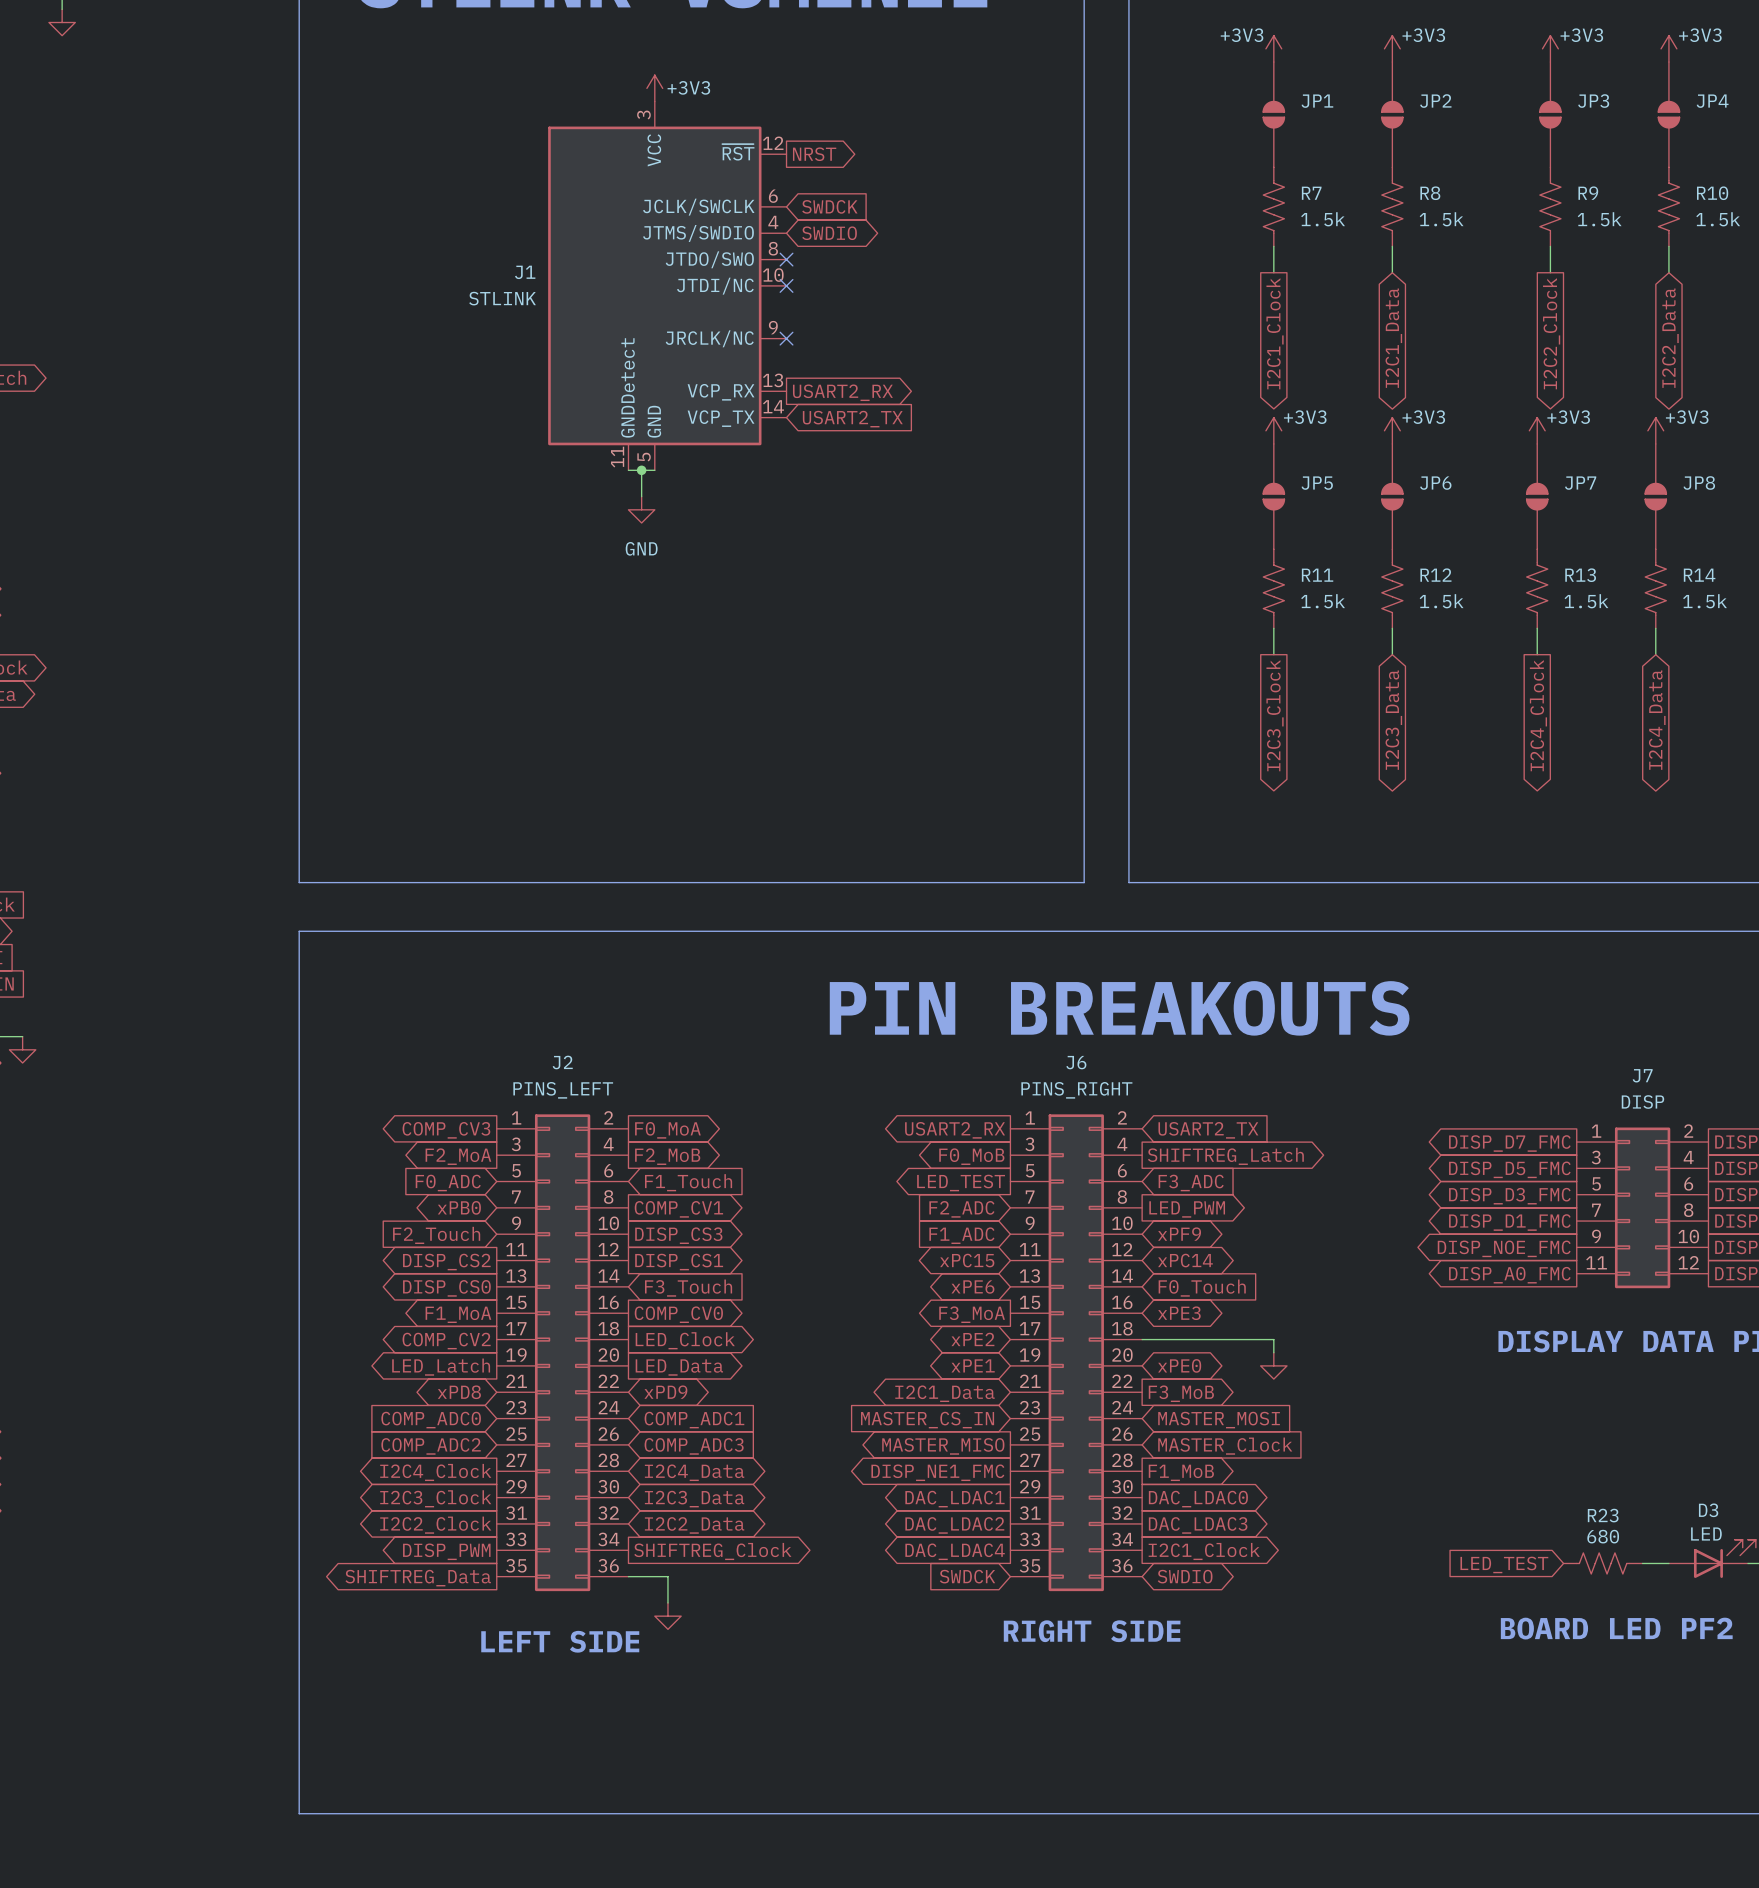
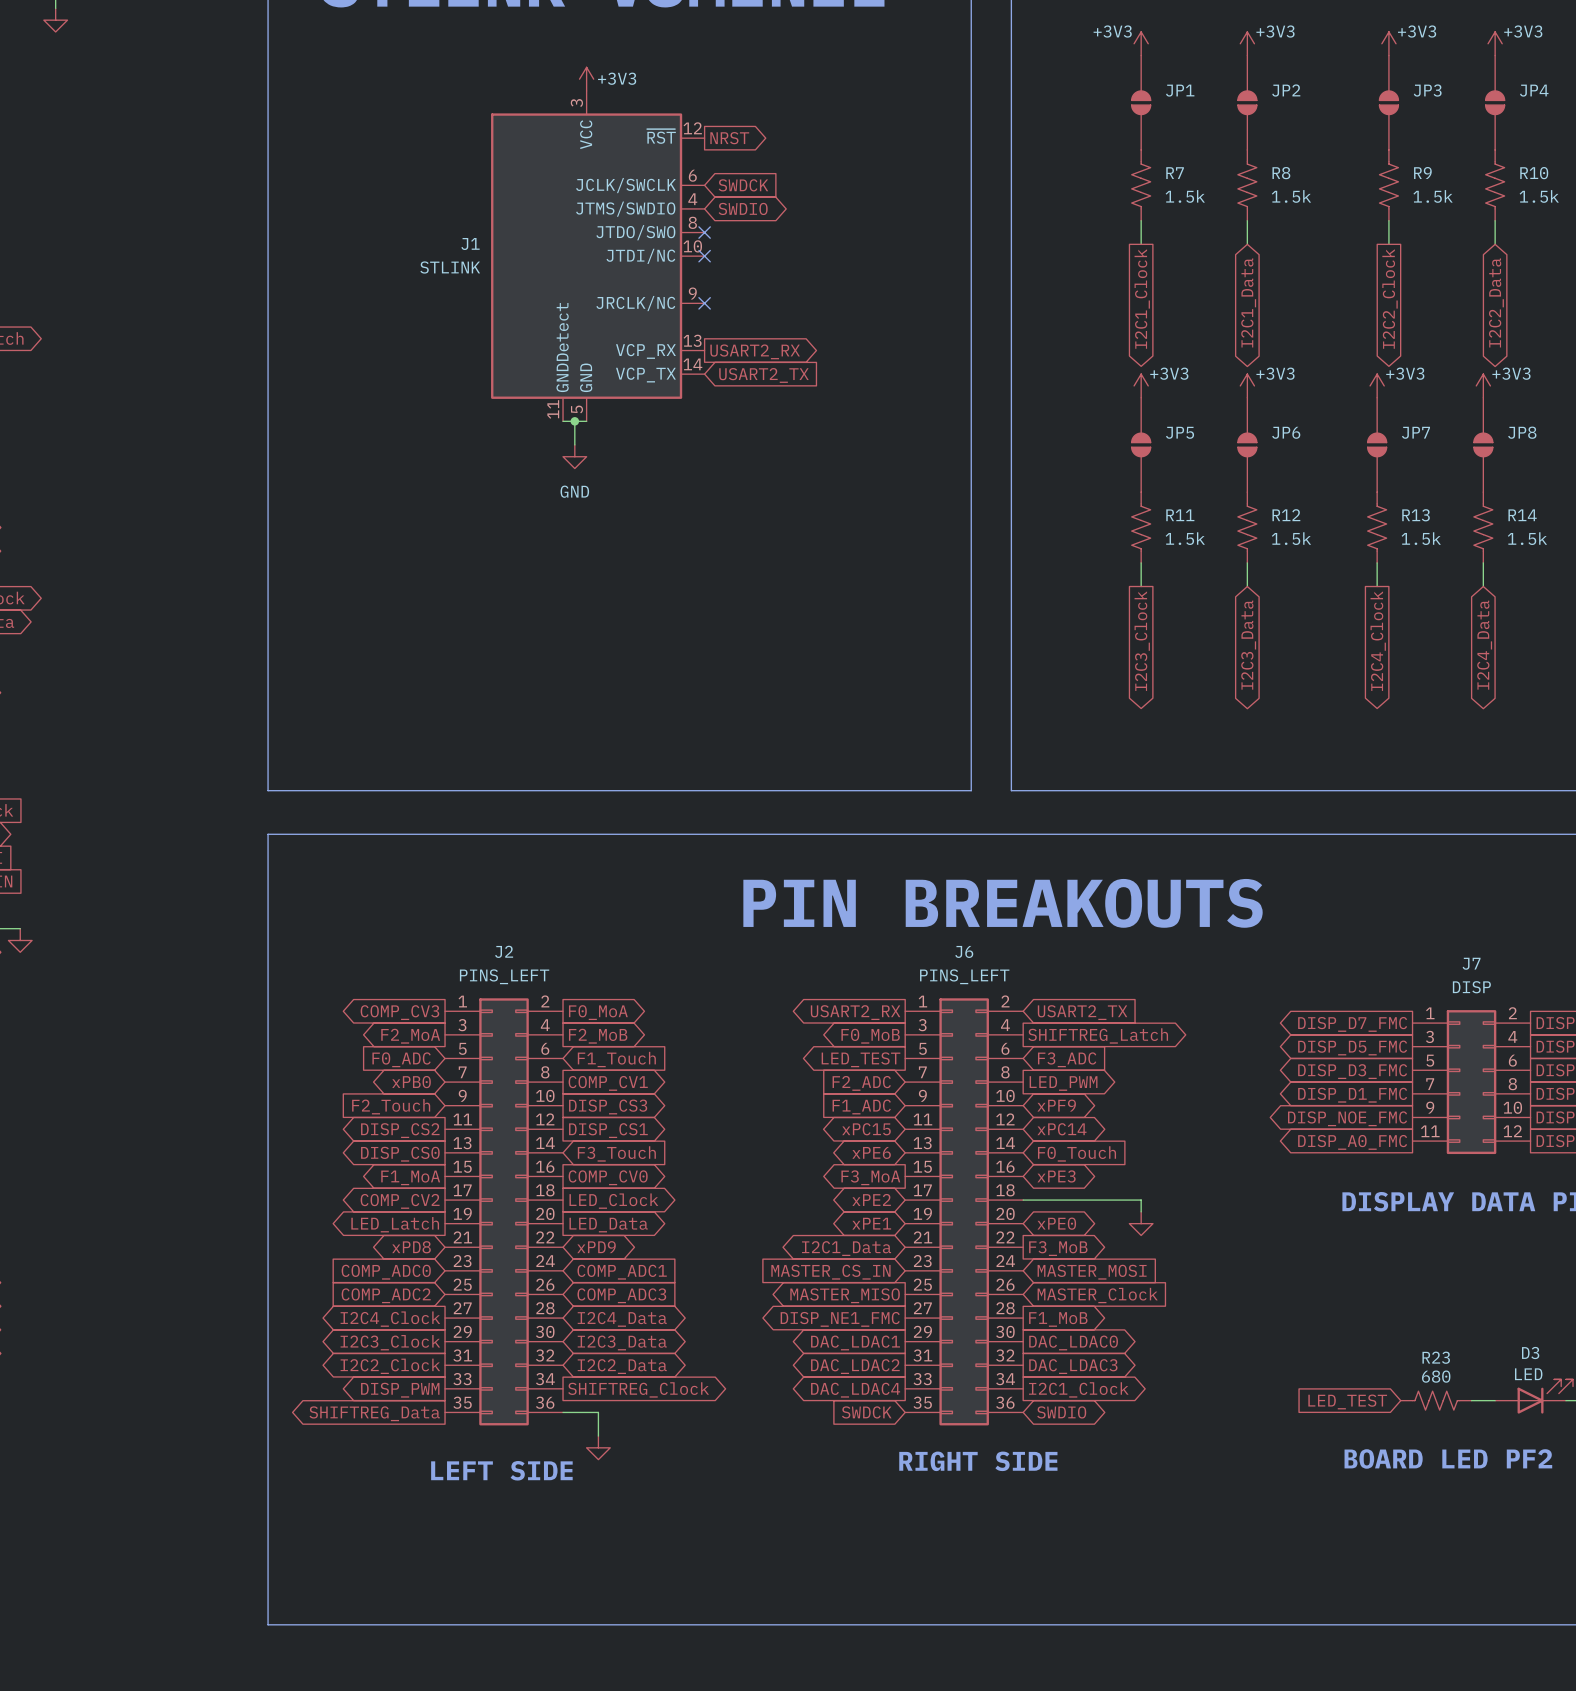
J6 value: PINS_RIGHT (1076, 1090) -> PINS_LEFT (964, 976)

